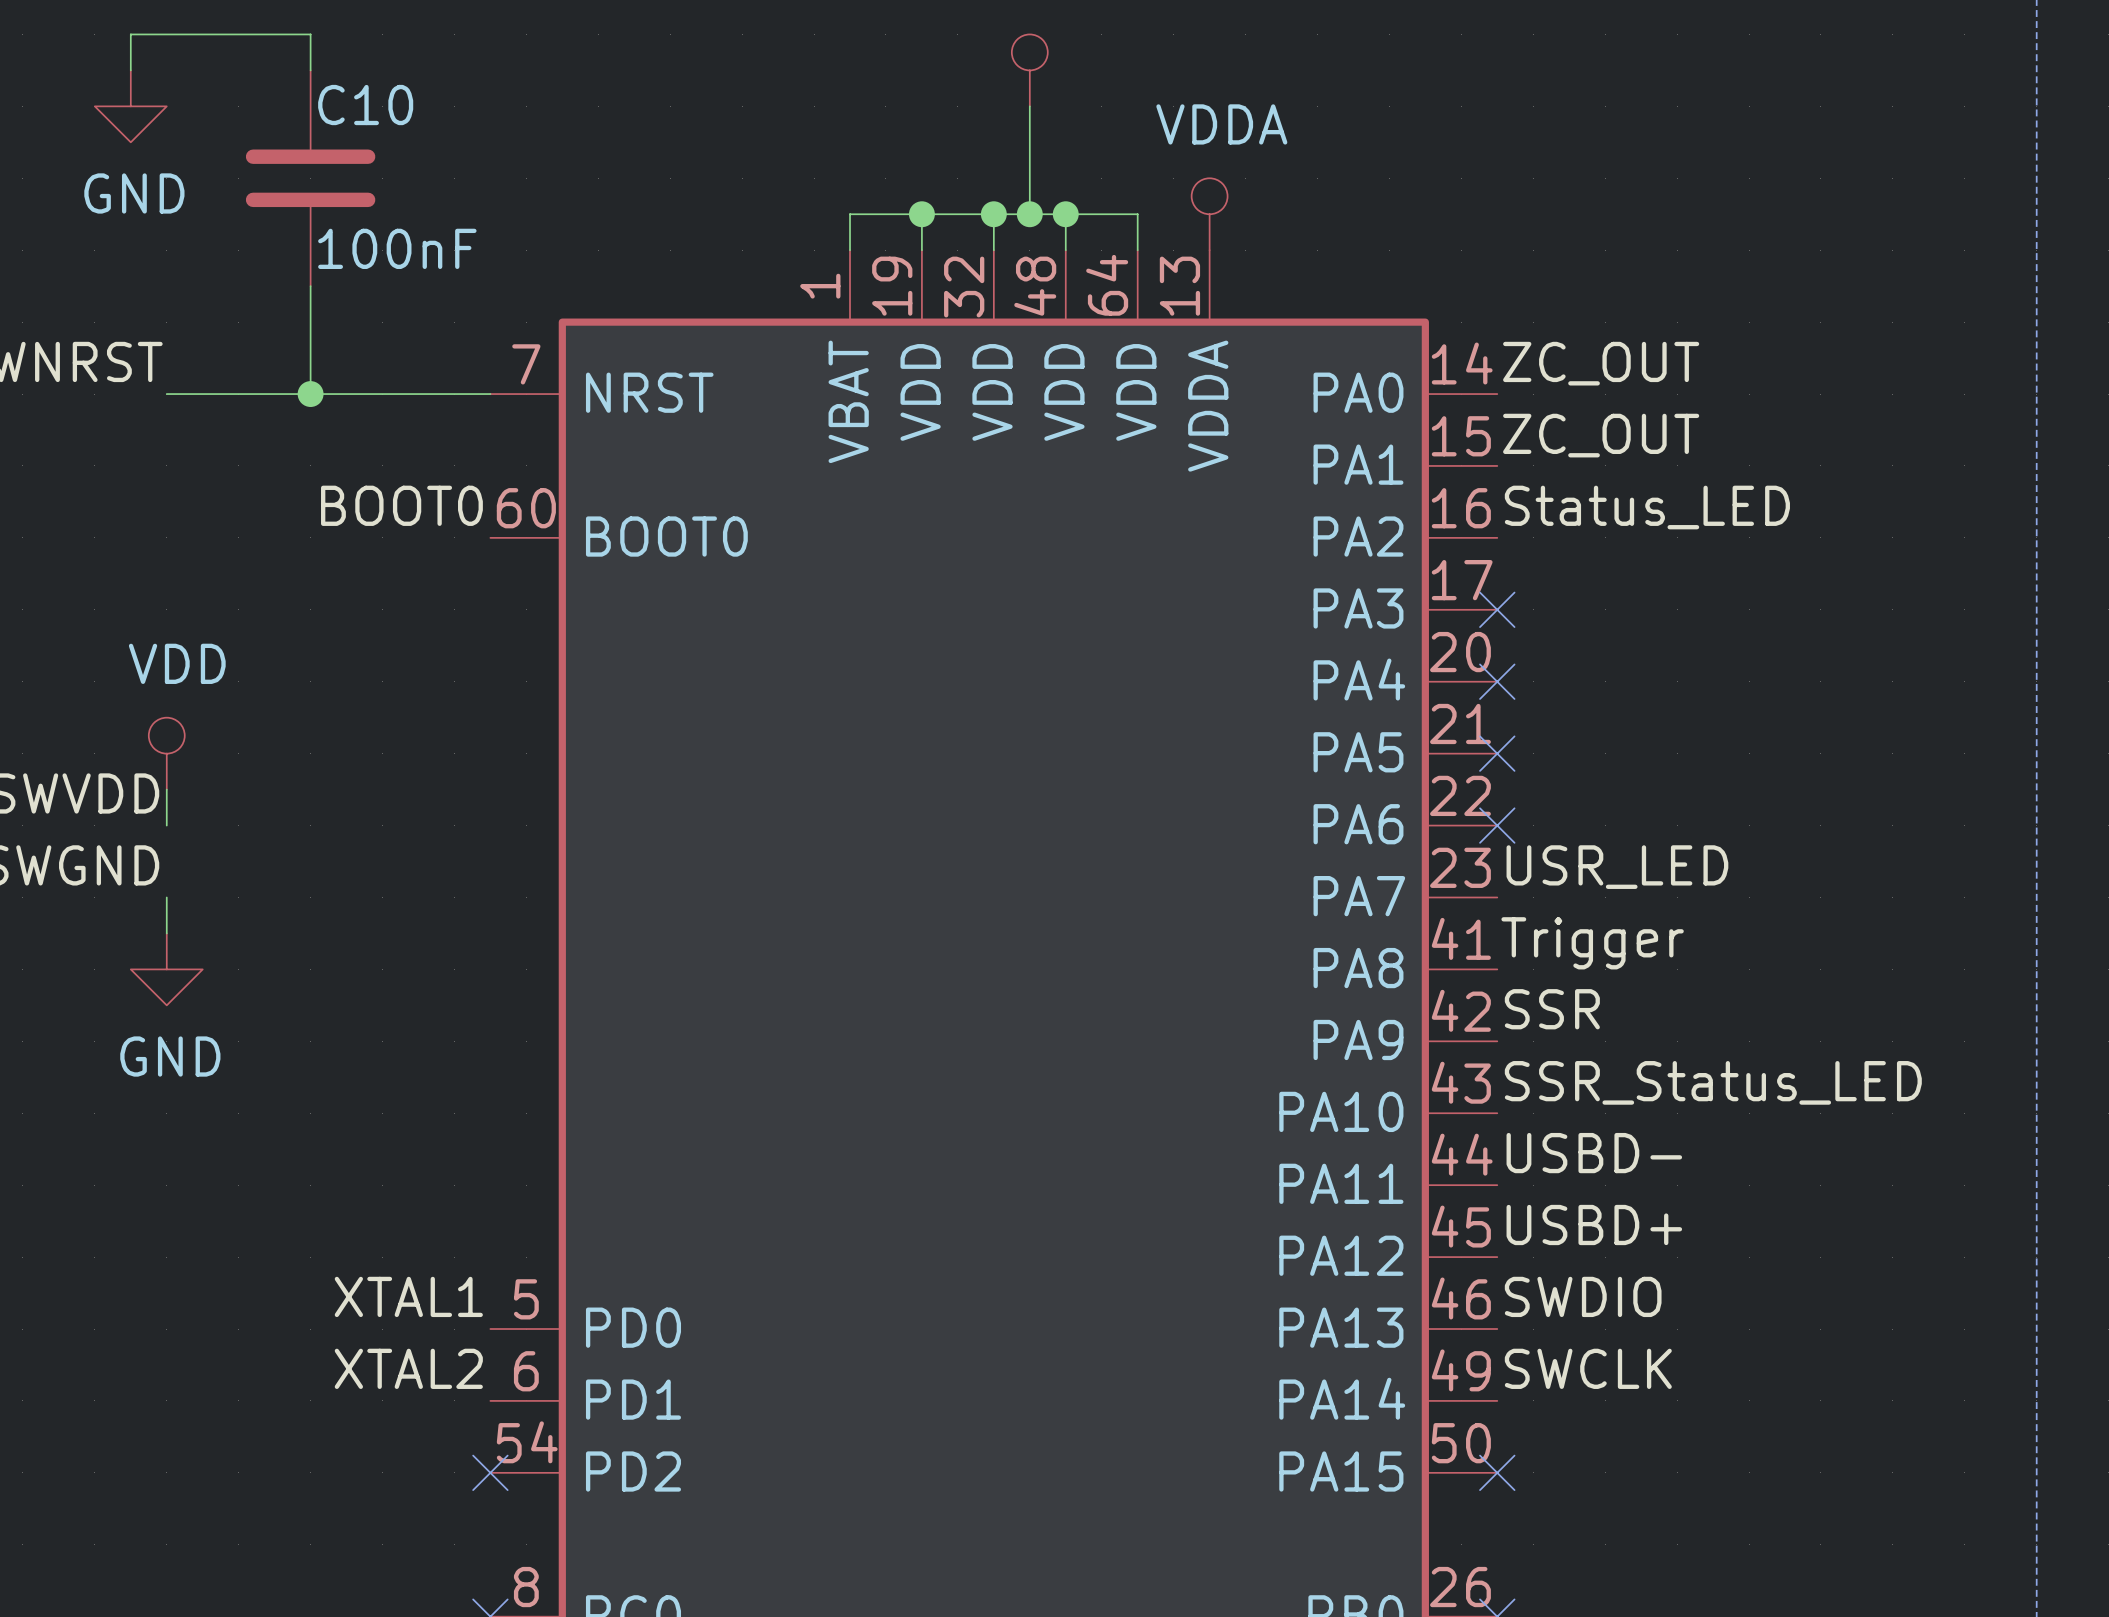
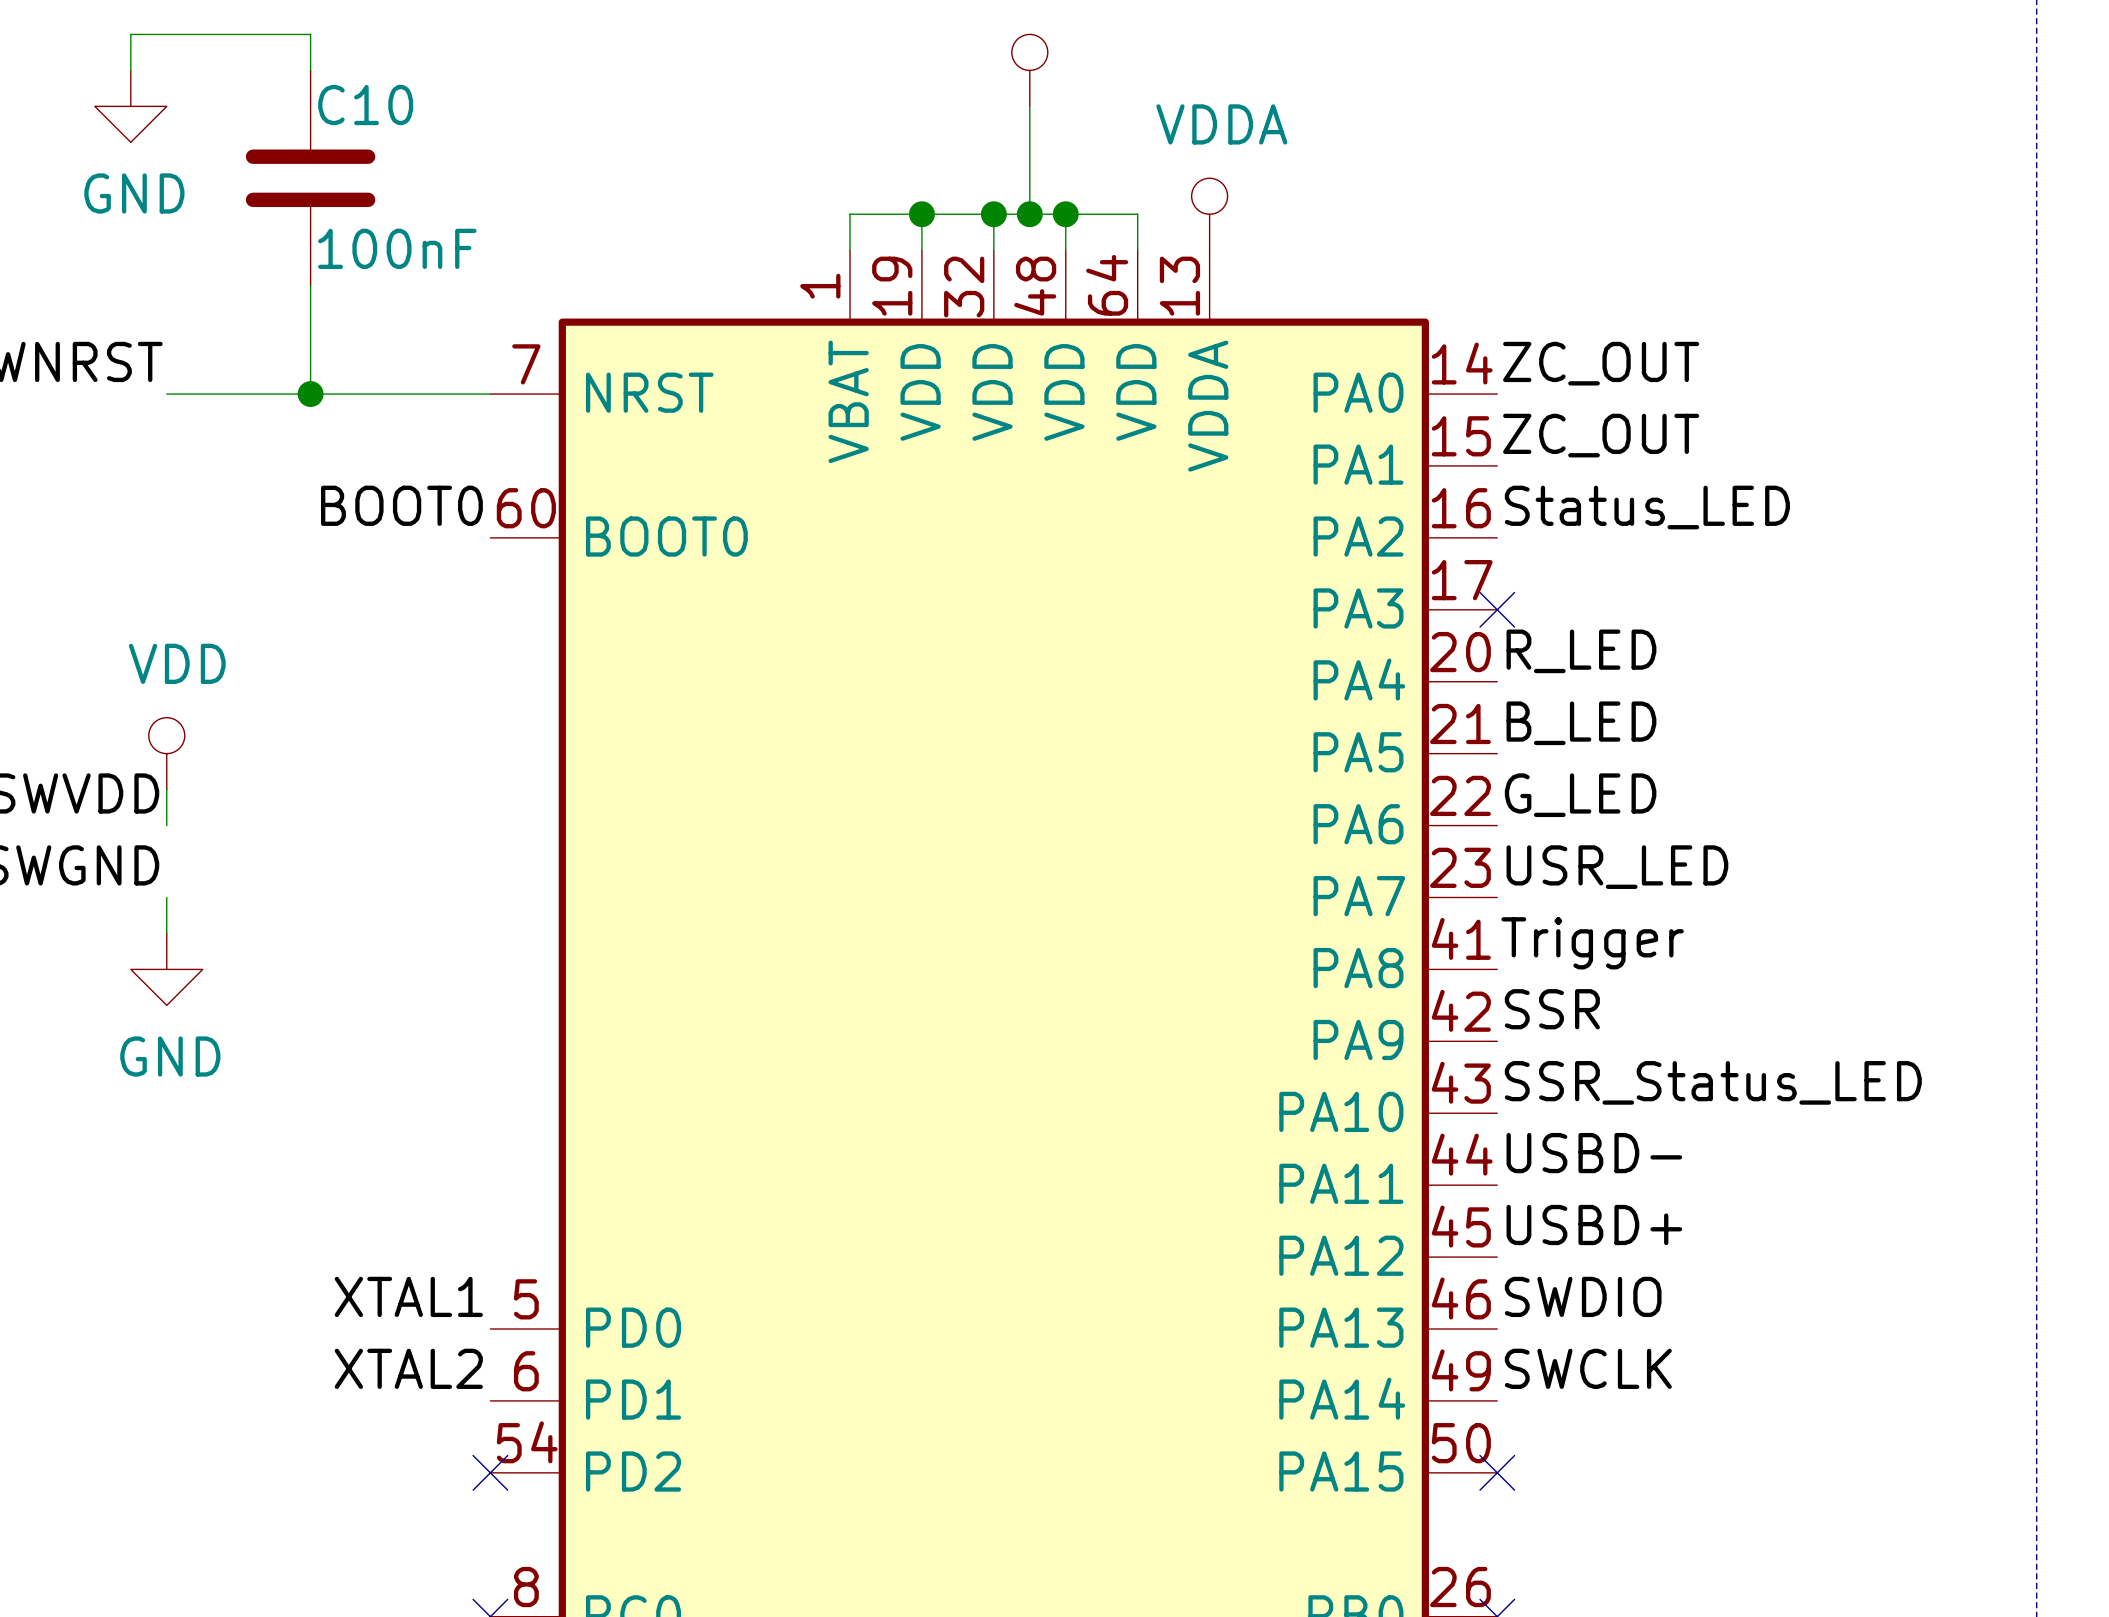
label: none -> R_LED (1581, 651)
no-connect mark: (1497, 681) -> none
label: none -> B_LED (1581, 723)
no-connect mark: (1497, 753) -> none
label: none -> G_LED (1580, 795)
no-connect mark: (1497, 825) -> none

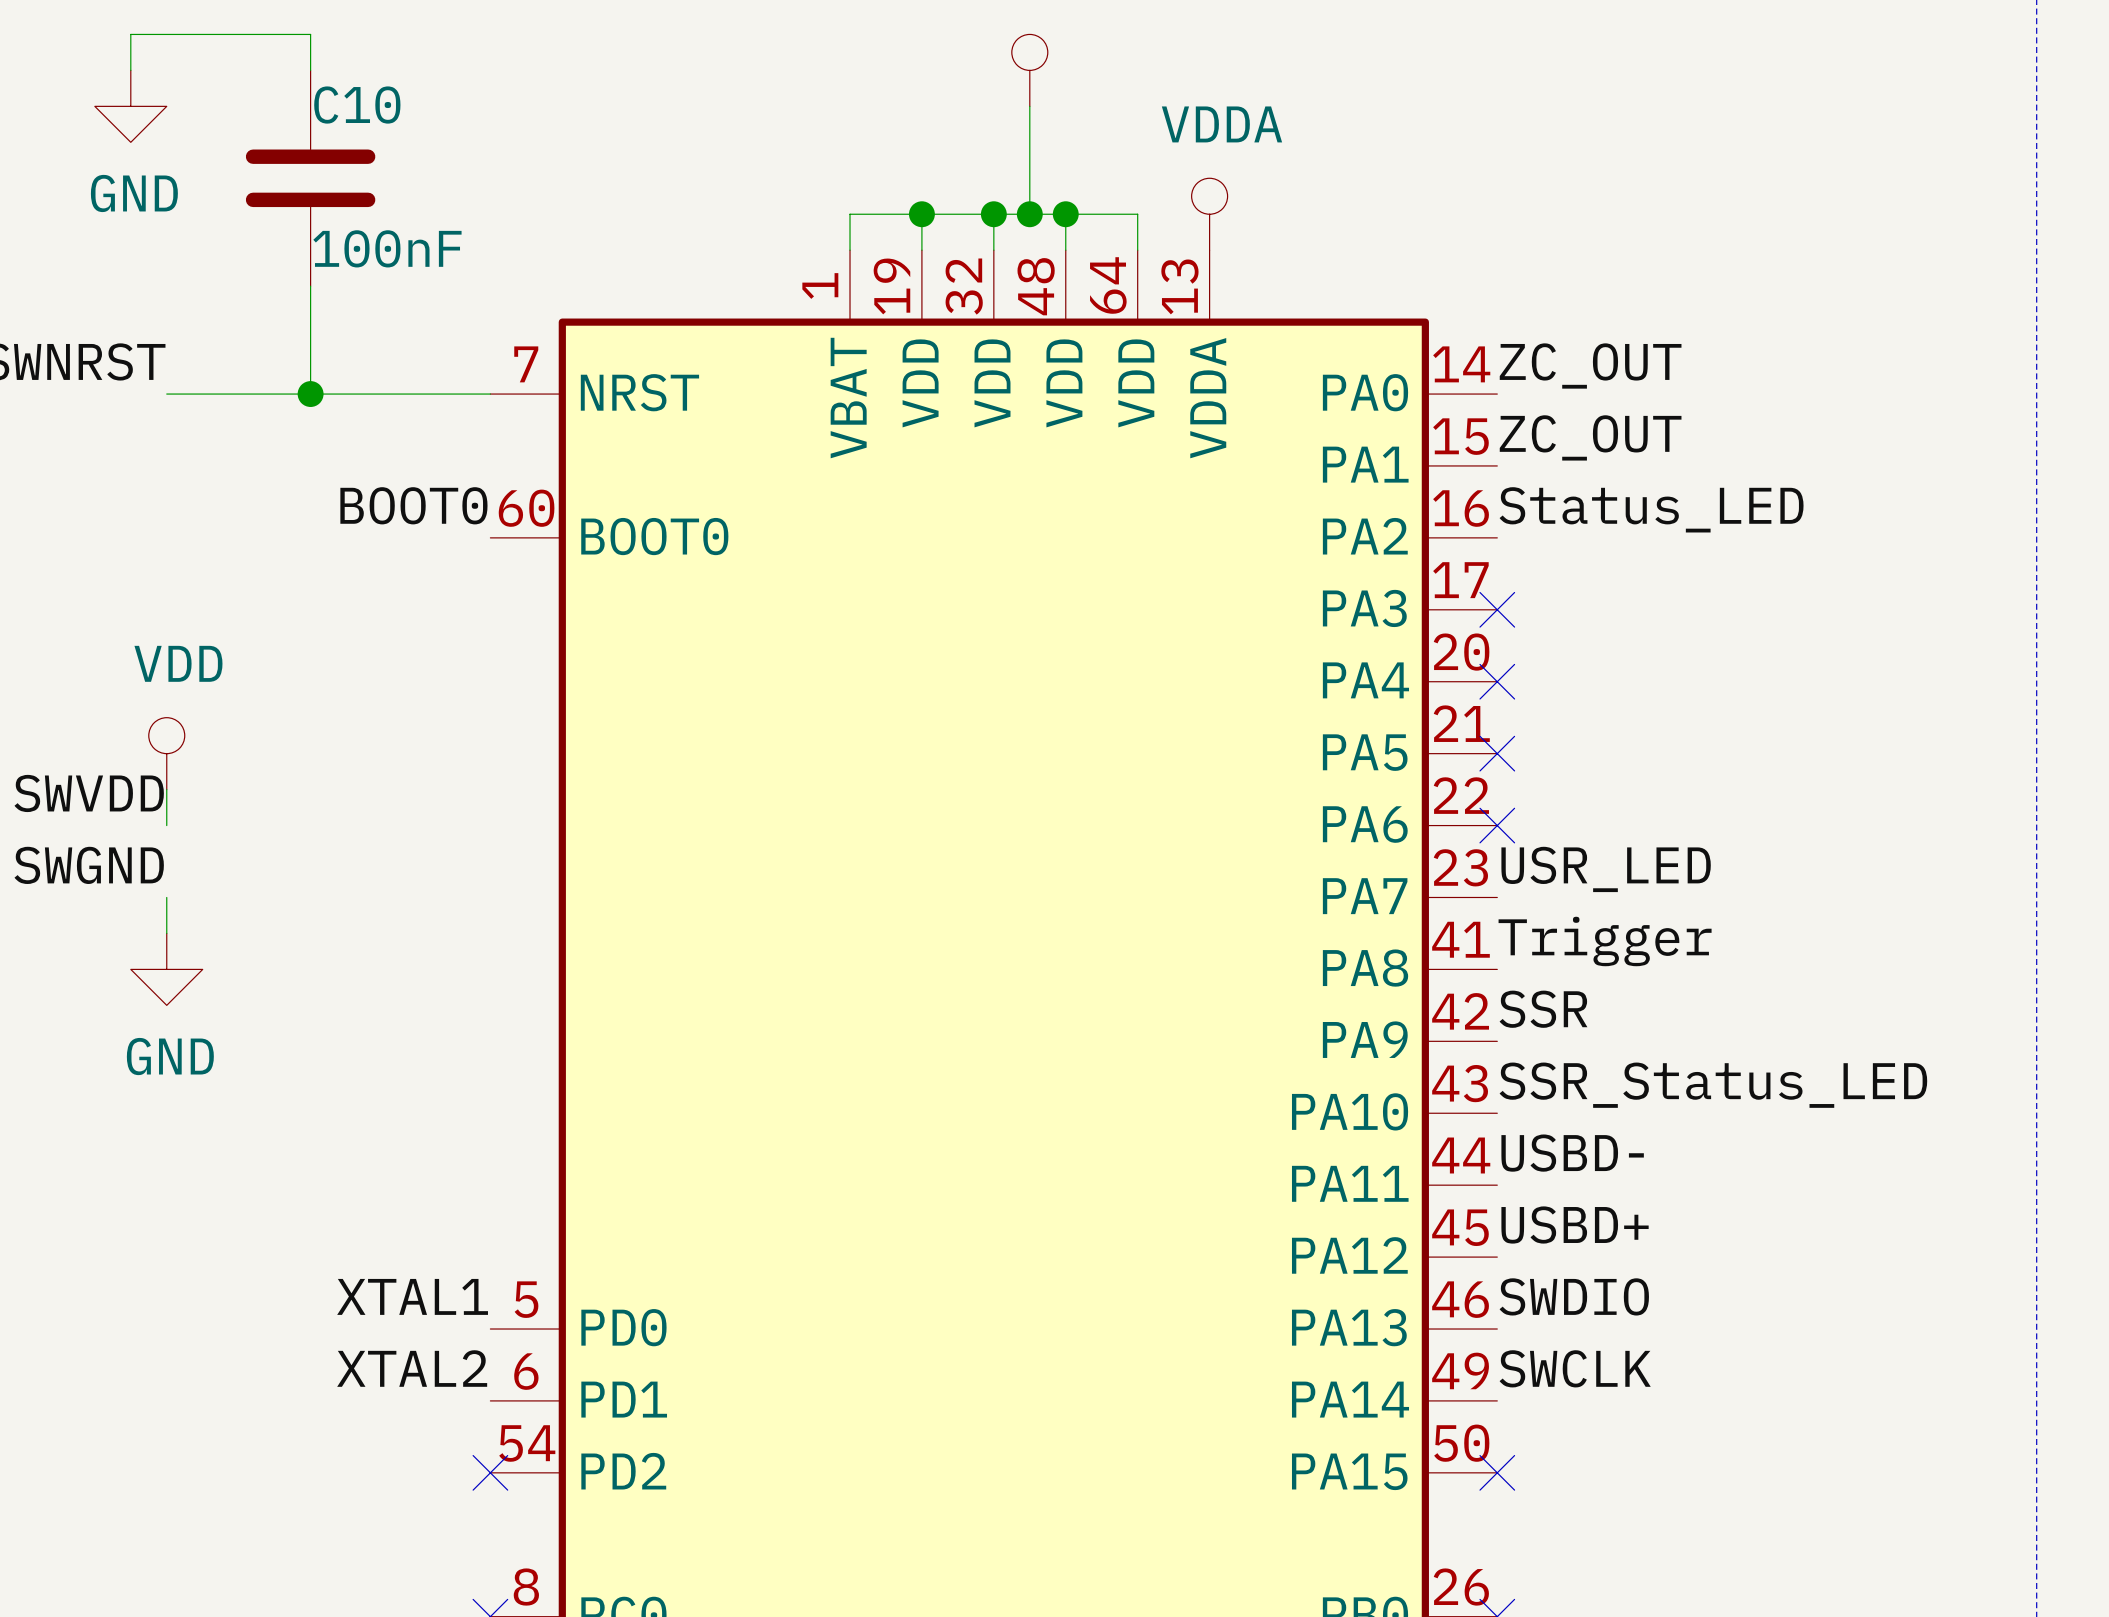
label: R_LED (1581, 651) -> none
no-connect mark: none -> (1497, 681)
label: B_LED (1581, 723) -> none
no-connect mark: none -> (1497, 753)
label: G_LED (1580, 795) -> none
no-connect mark: none -> (1497, 825)

